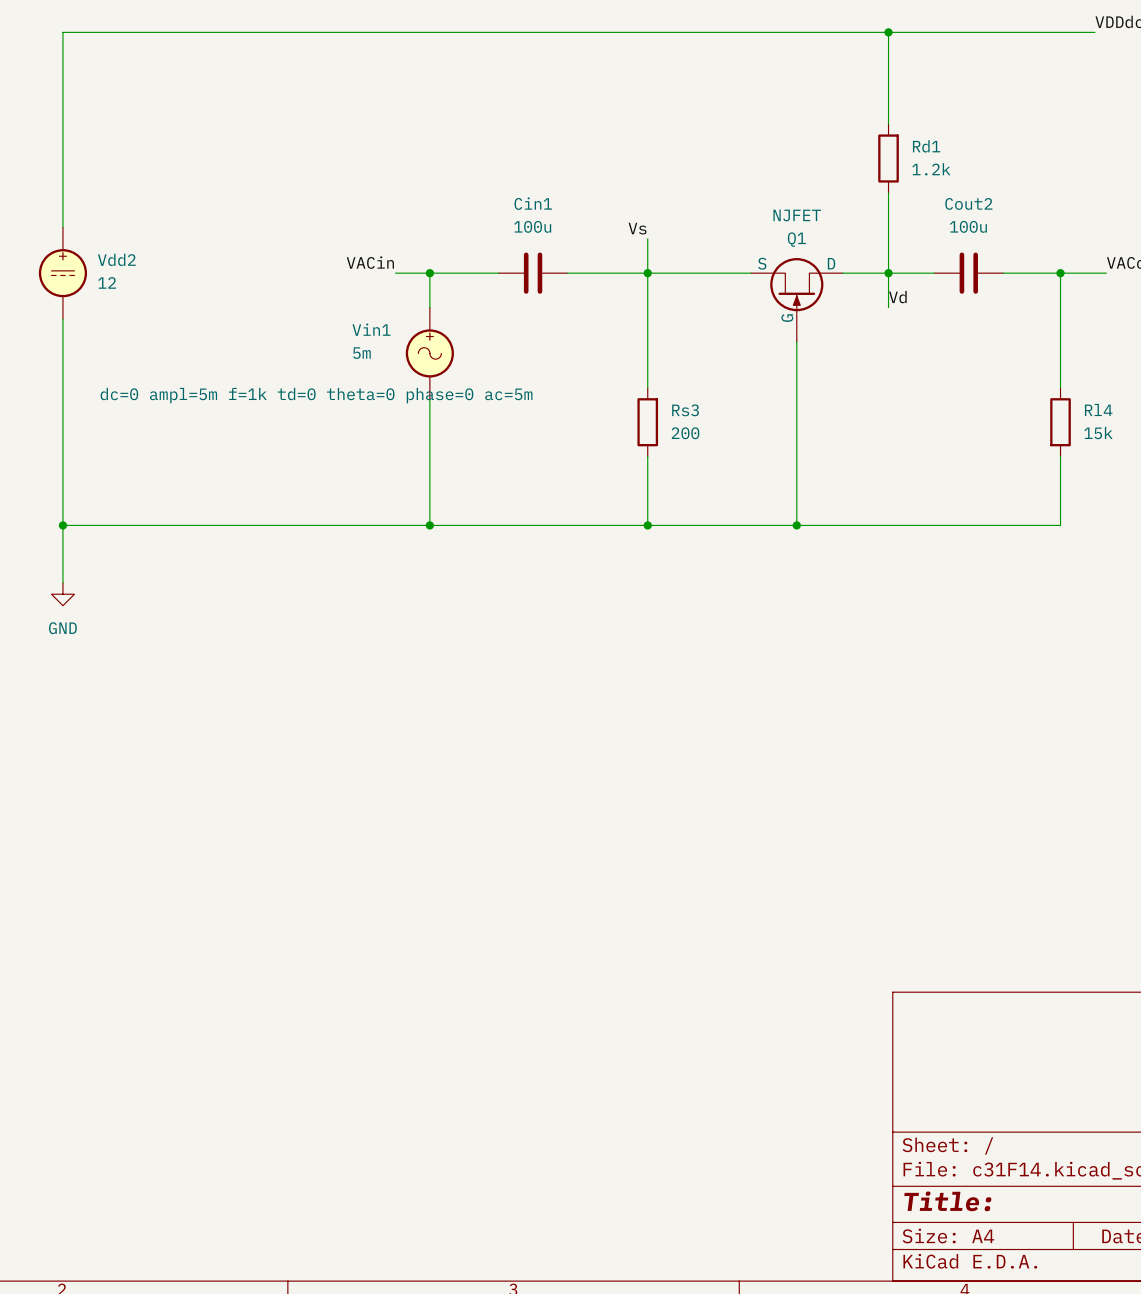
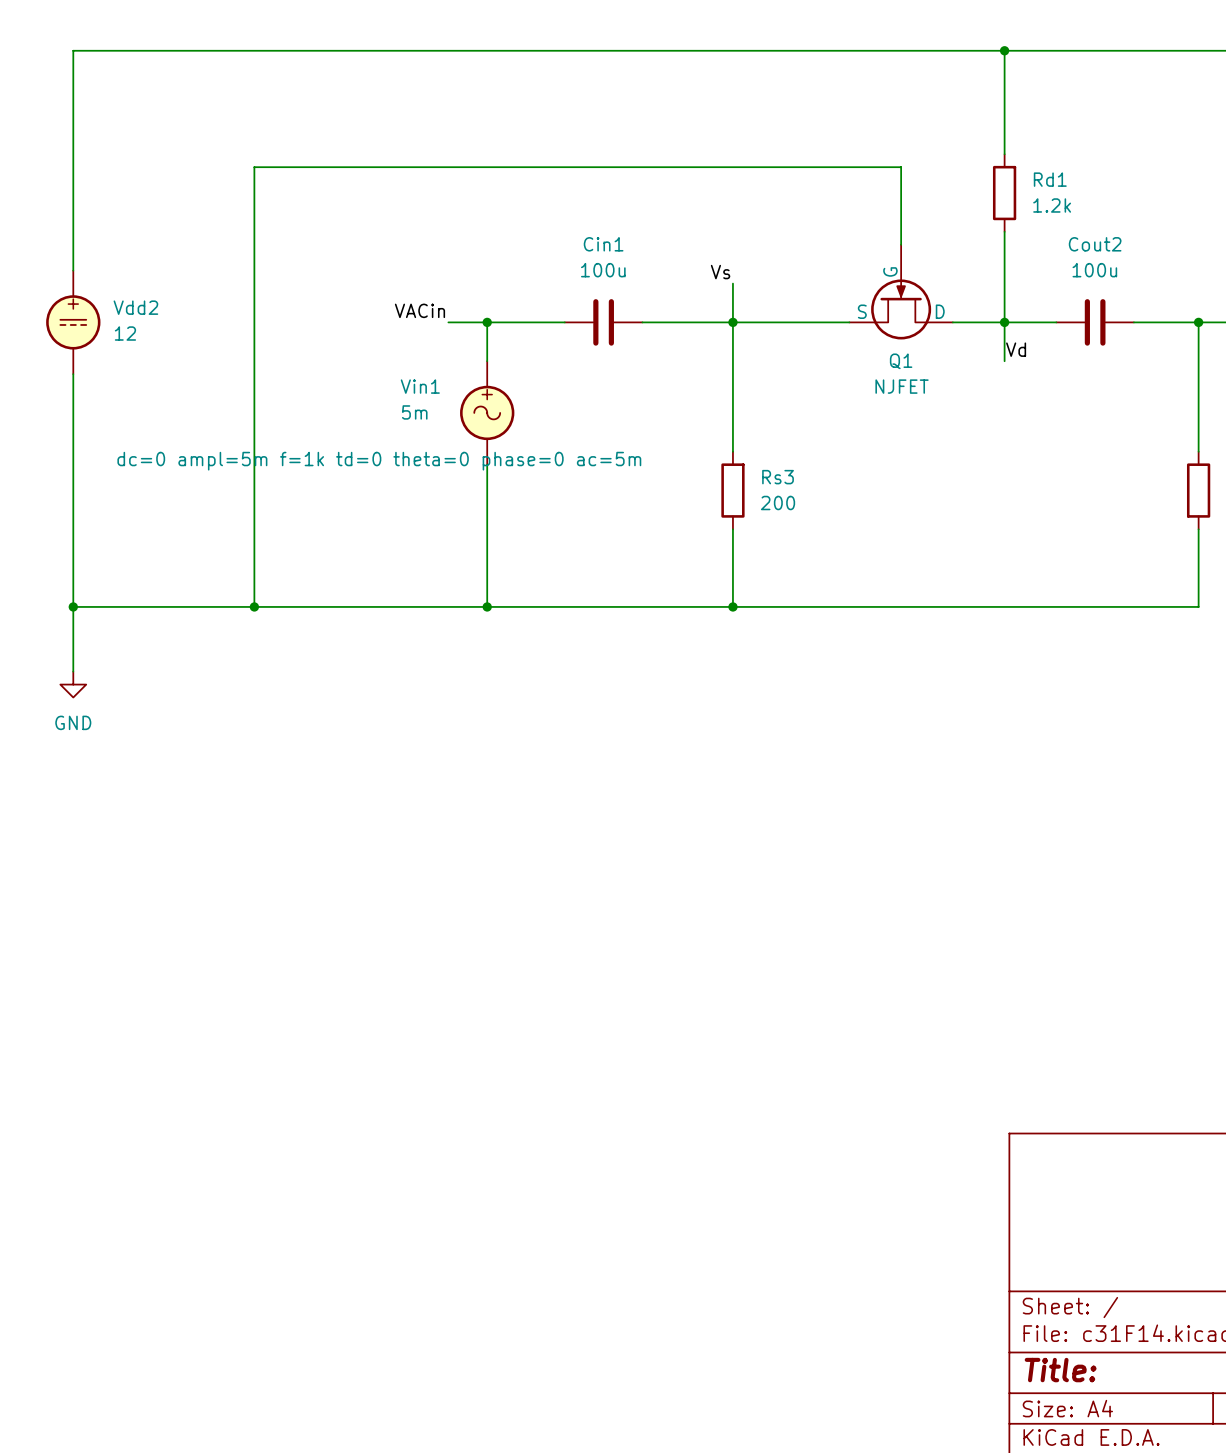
wire: none -> (901, 244) (901, 167) (254, 167) (254, 606)
Q1 flip: as is (796, 284) -> up-down (901, 309)
wire: (796, 341) (796, 525) -> none
junction: none -> (254, 606)
junction: (796, 525) -> none

